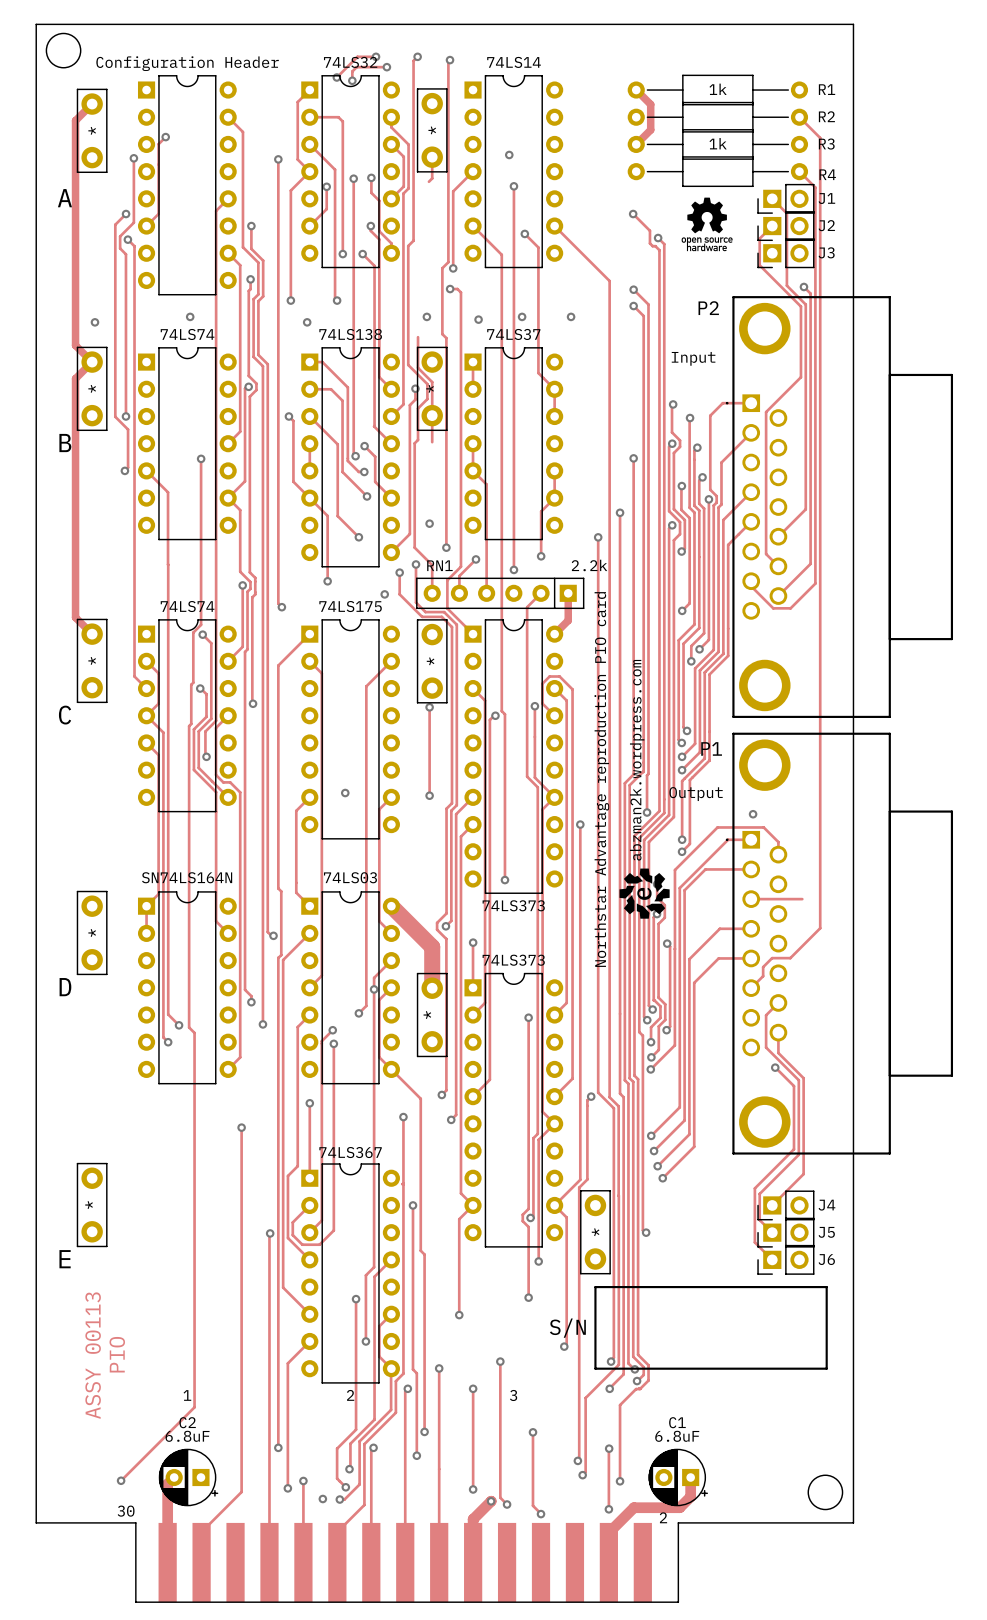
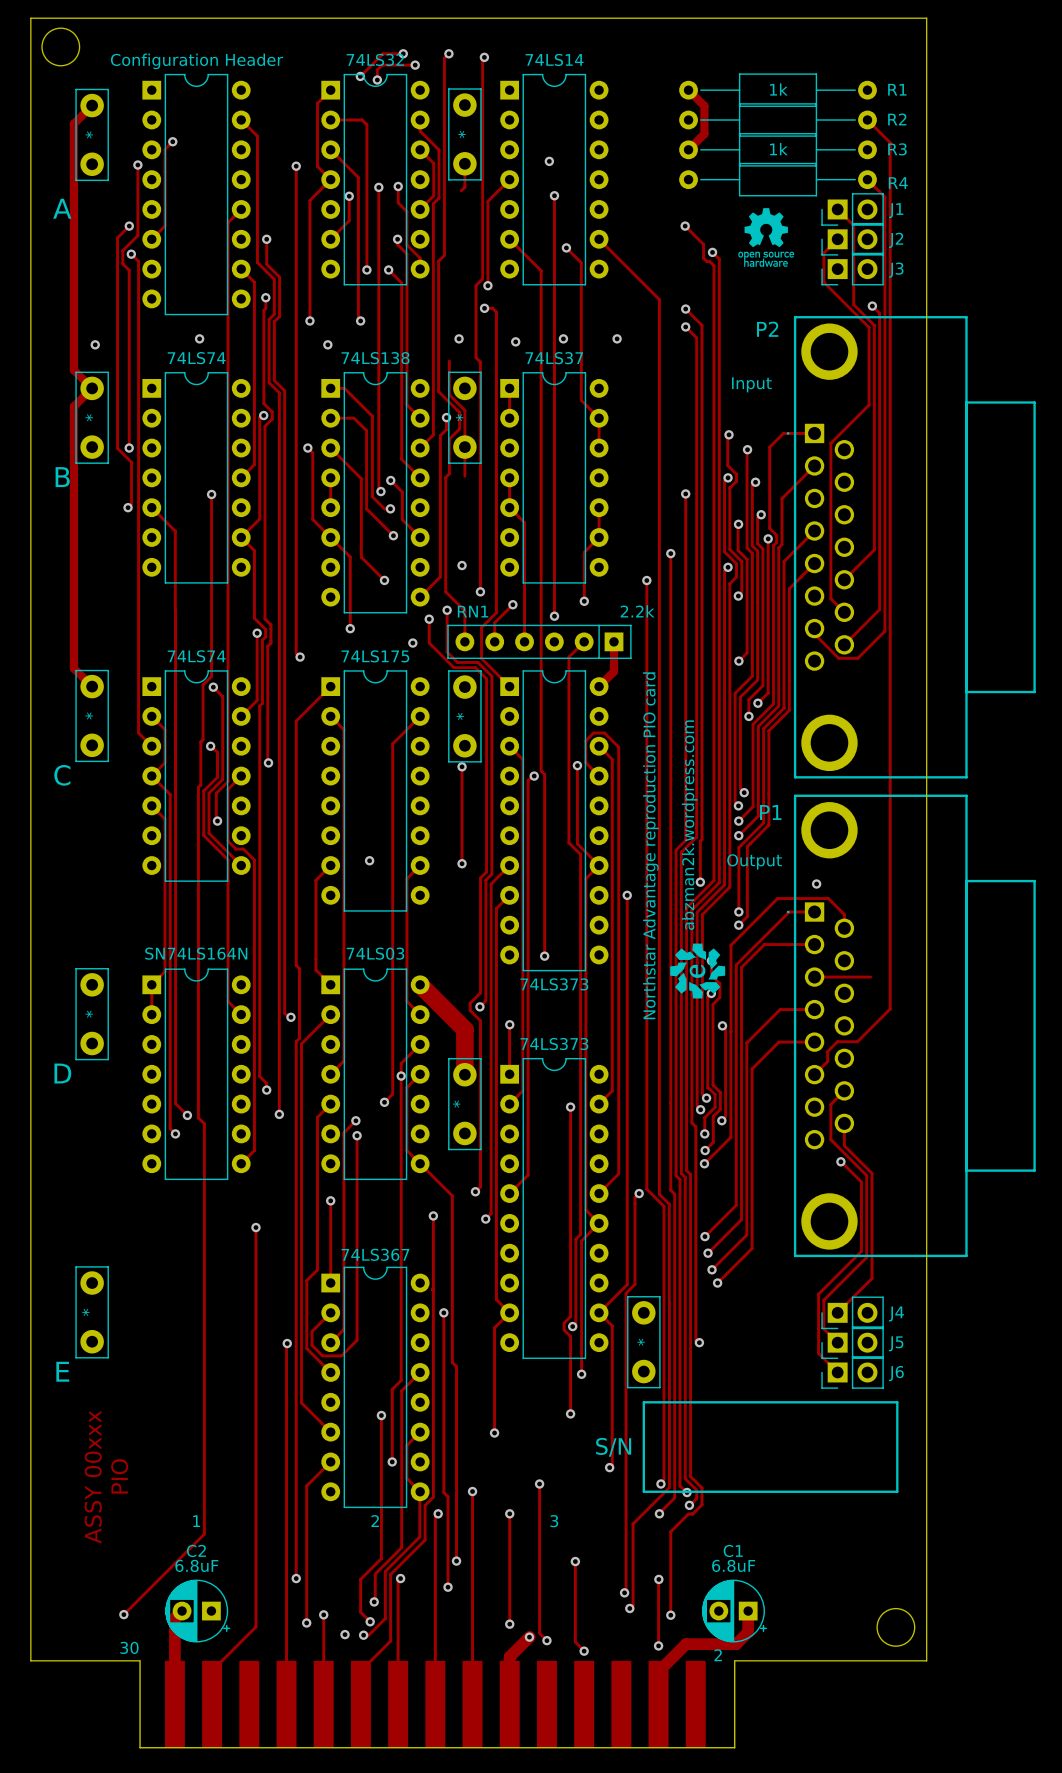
text: ASSY 00113 (93, 1355) -> ASSY 00xxx (93, 1477)

